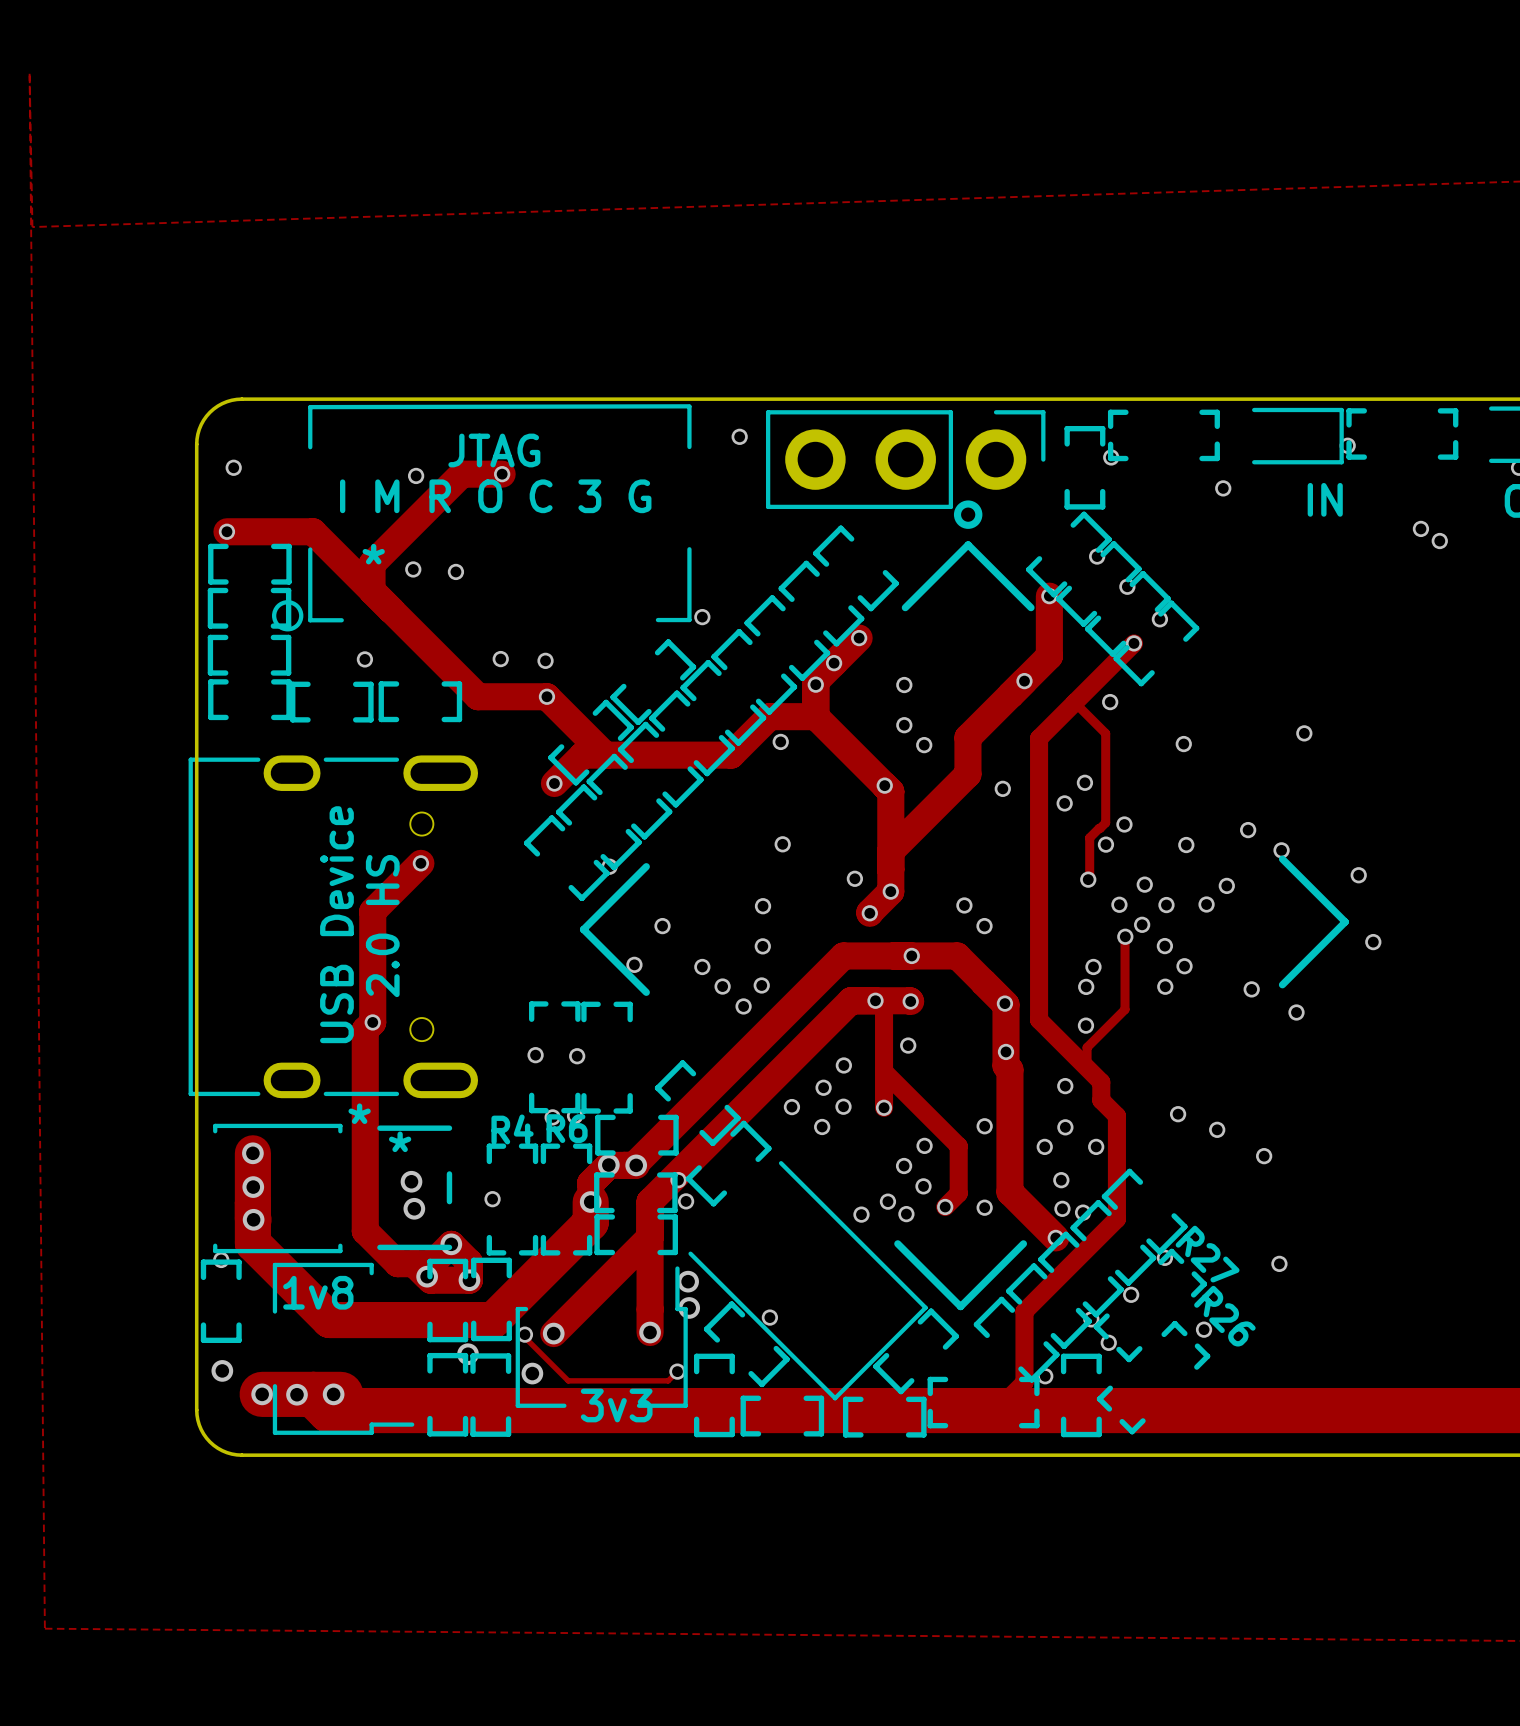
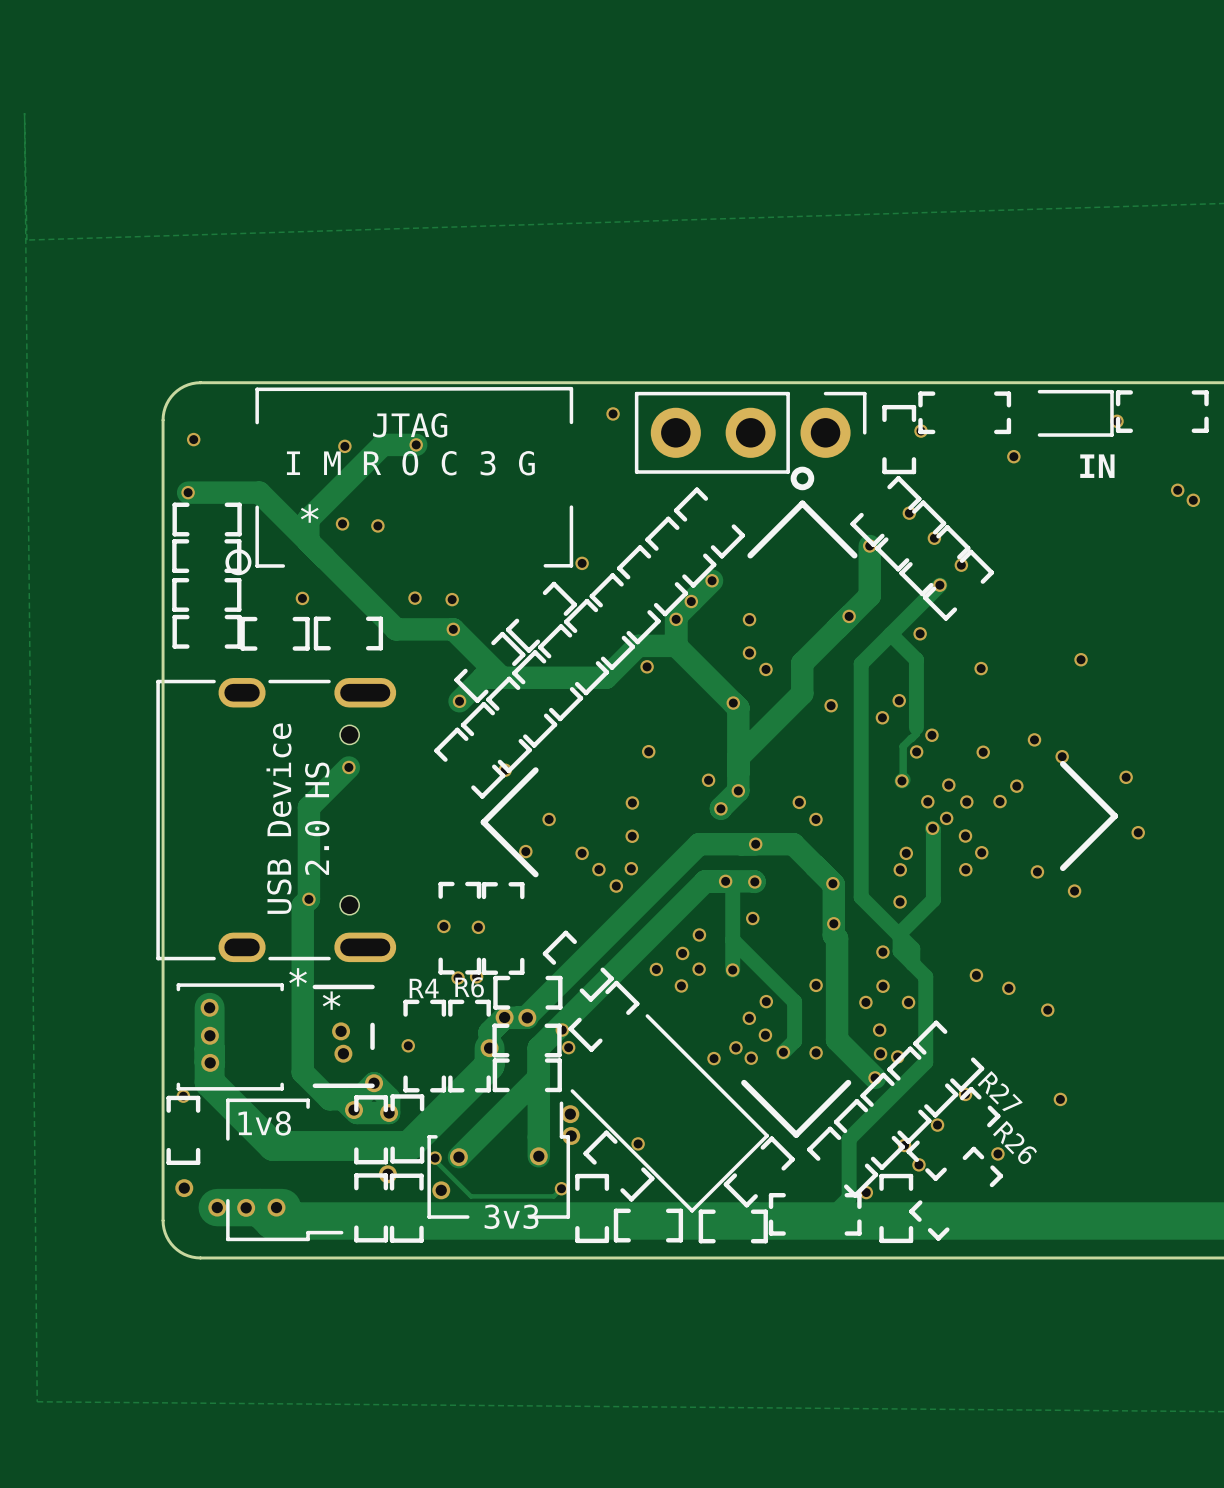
track width: thin (1074, 702) (1105, 733) (1105, 815) -> thick (890, 634) (916, 659) (916, 727)
track: (1125, 937) (1125, 1009) (1087, 1047) (1087, 1067) (1101, 1082) -> (932, 828) (933, 899) (900, 933) (900, 951) (912, 963)

